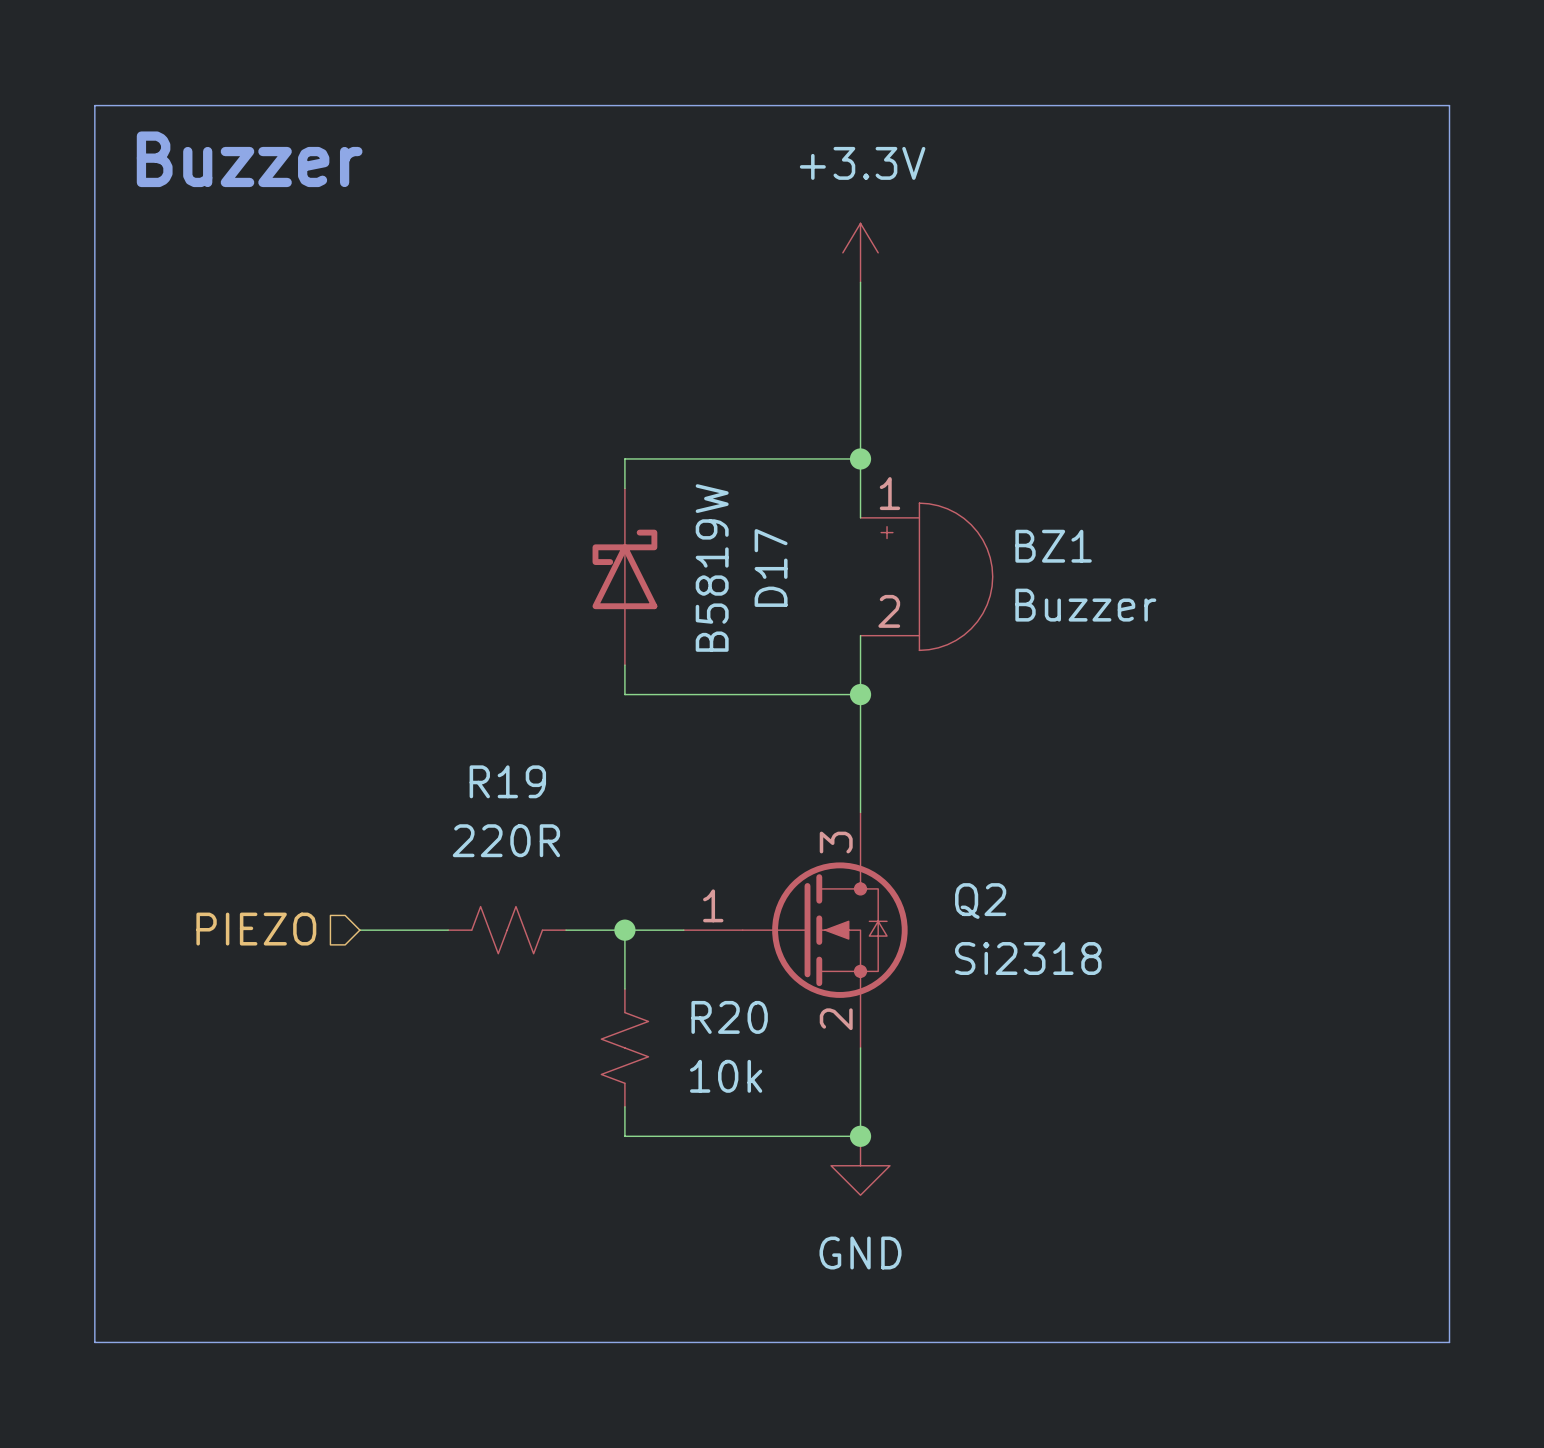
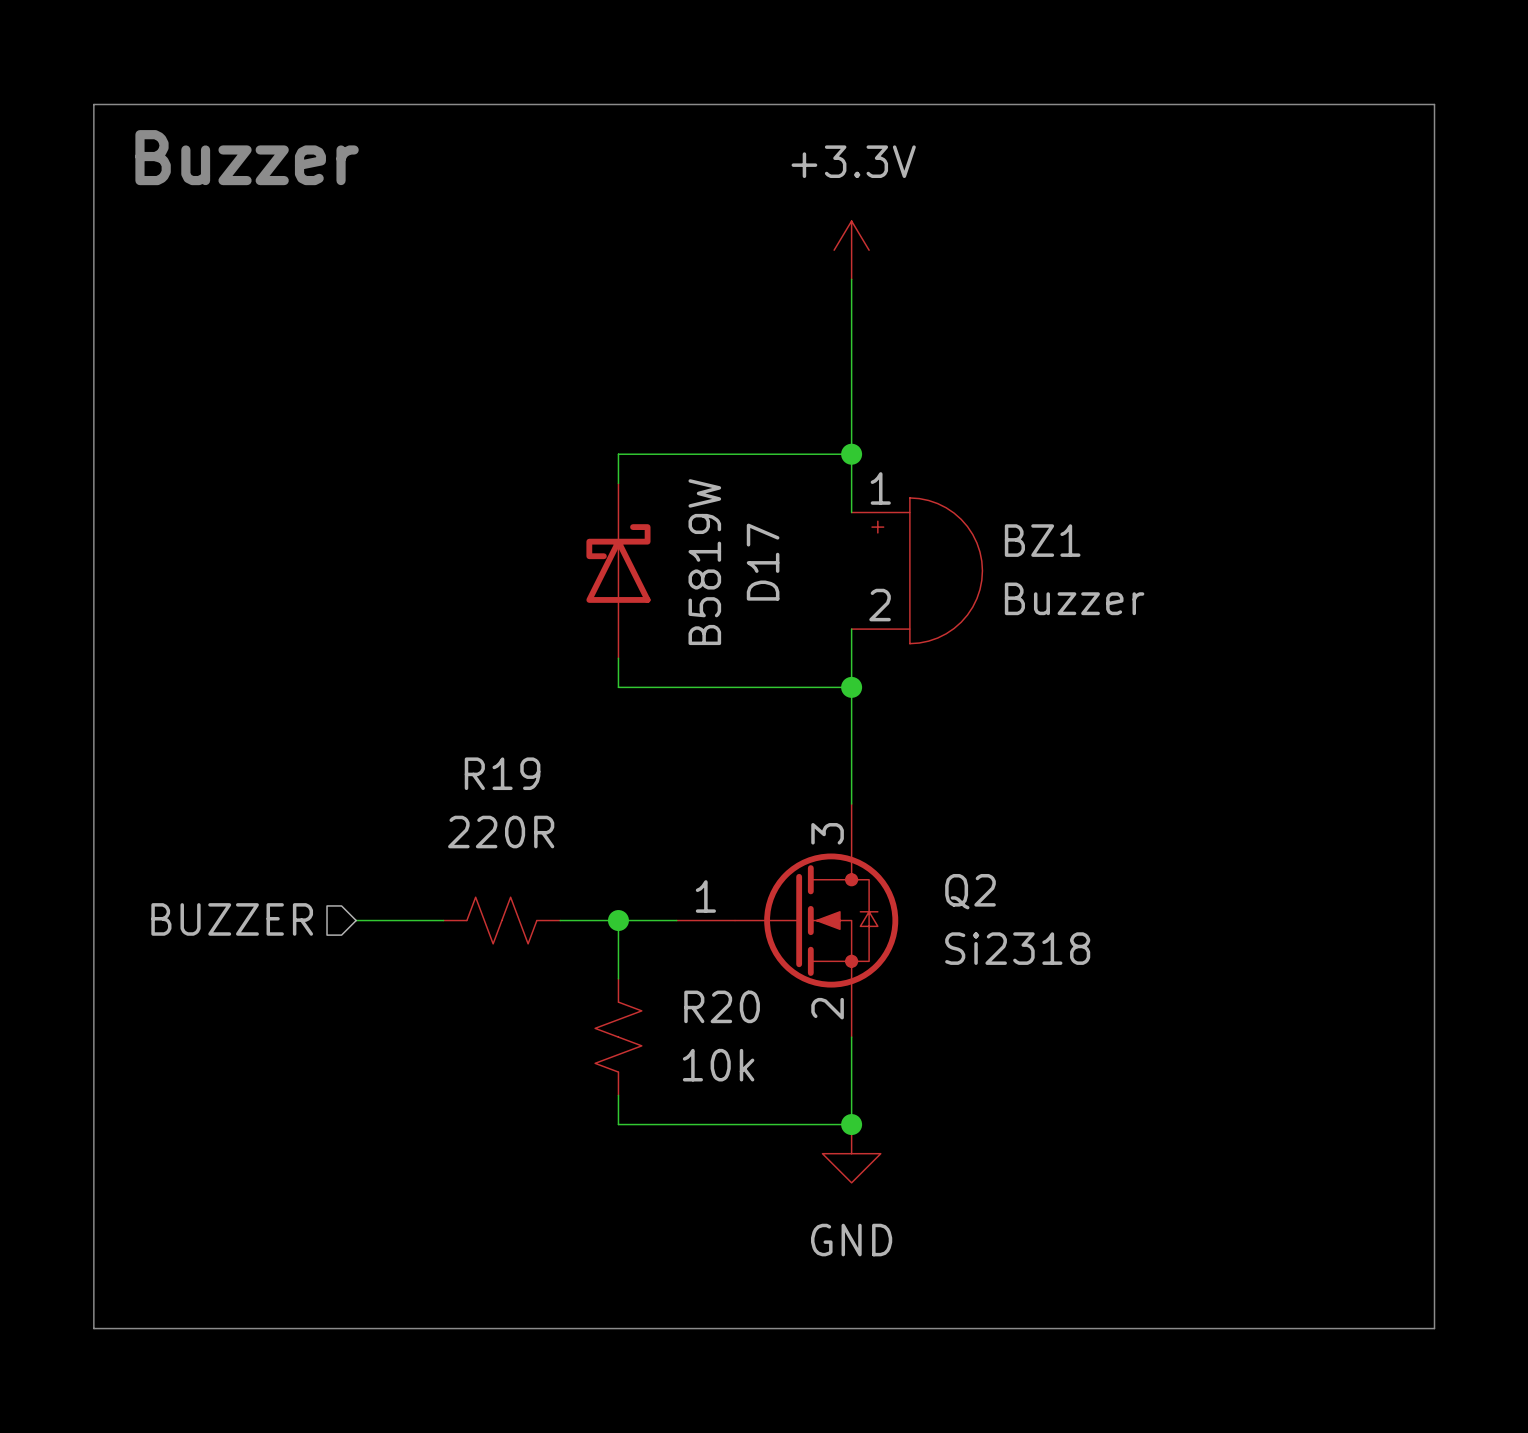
hierarchical label: PIEZO (256, 929) -> BUZZER (232, 919)

